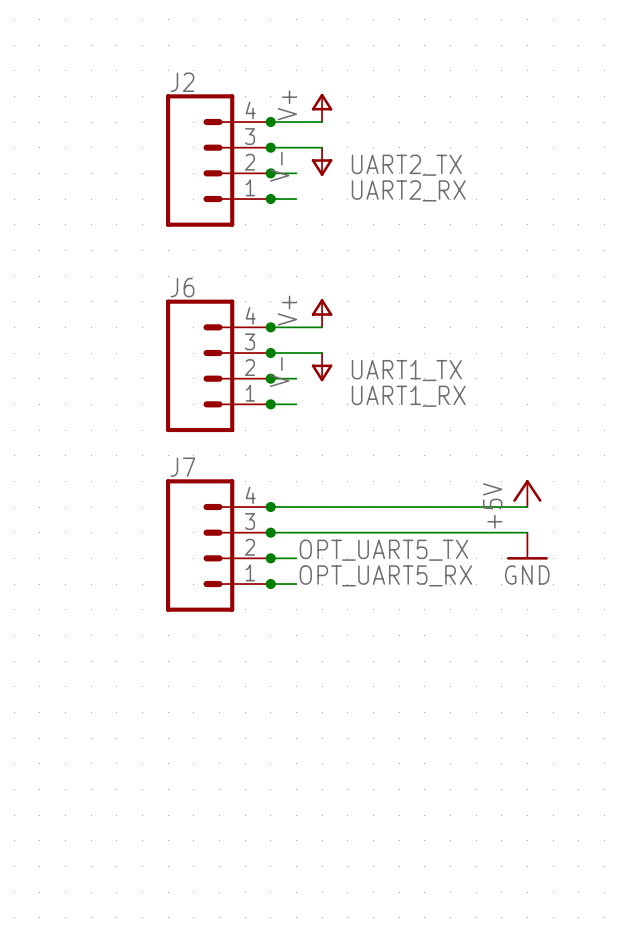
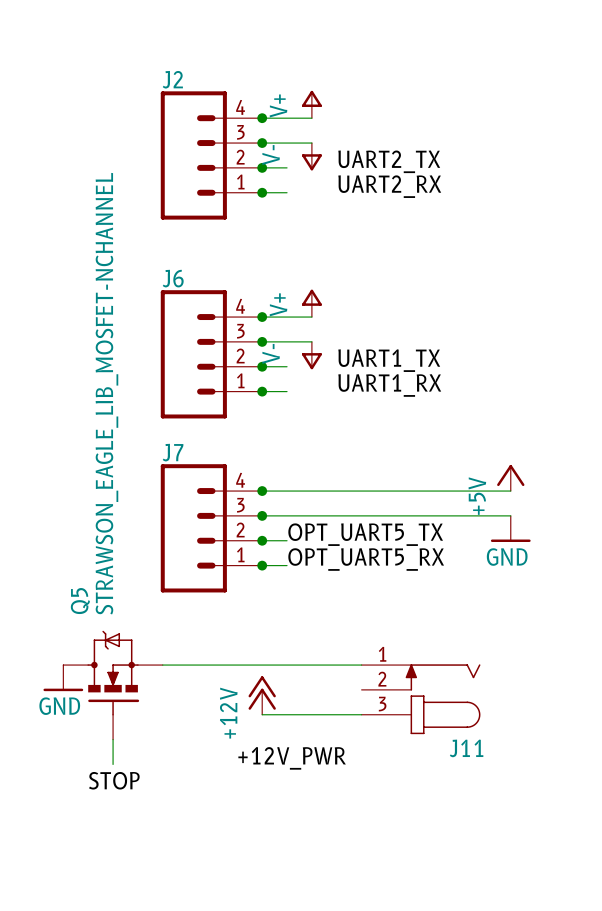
wire: none -> (162, 665) (361, 665)
power symbol: none -> GND (63, 678)
Q5: none -> STRAWSON_EAGLE_LIB_MOSFET-NCHANNEL (113, 685)
power symbol: none -> +12V (262, 695)
J11: none -> (421, 699)
wire: none -> (262, 714) (361, 714)
wire: none -> (113, 739) (113, 764)
label: none -> +12V_PWR (292, 758)
label: none -> STOP (114, 780)

